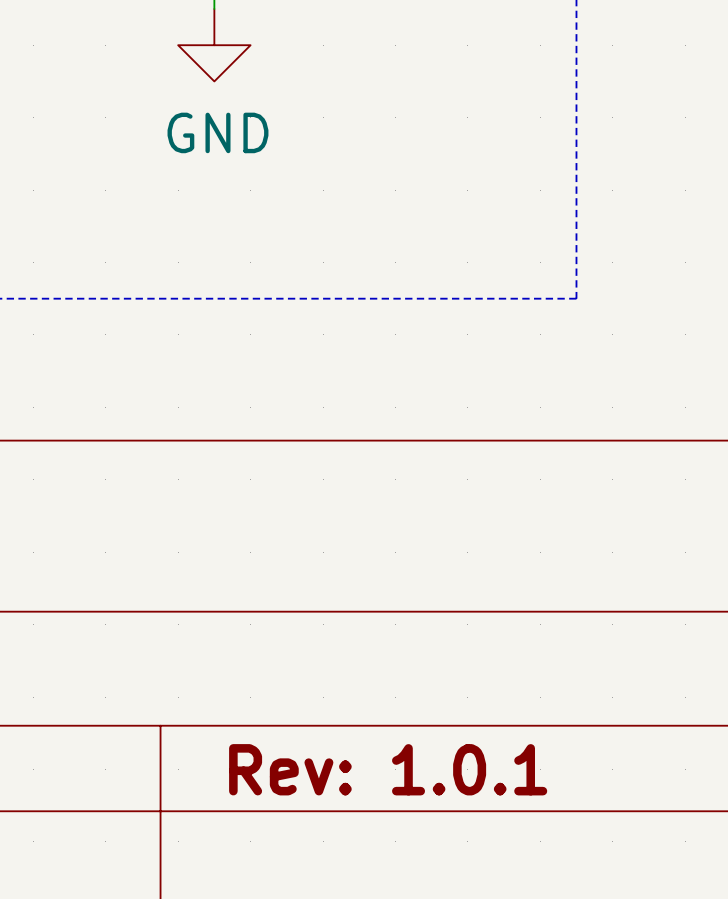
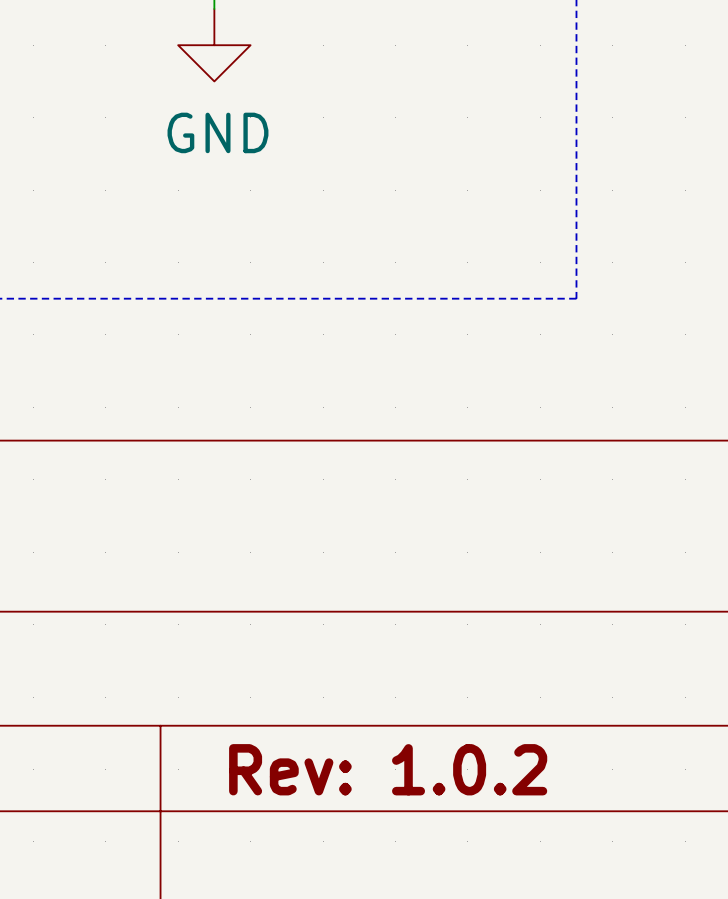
title block: Rev: 1.0.1 (388, 769) -> Rev: 1.0.2 (388, 769)

